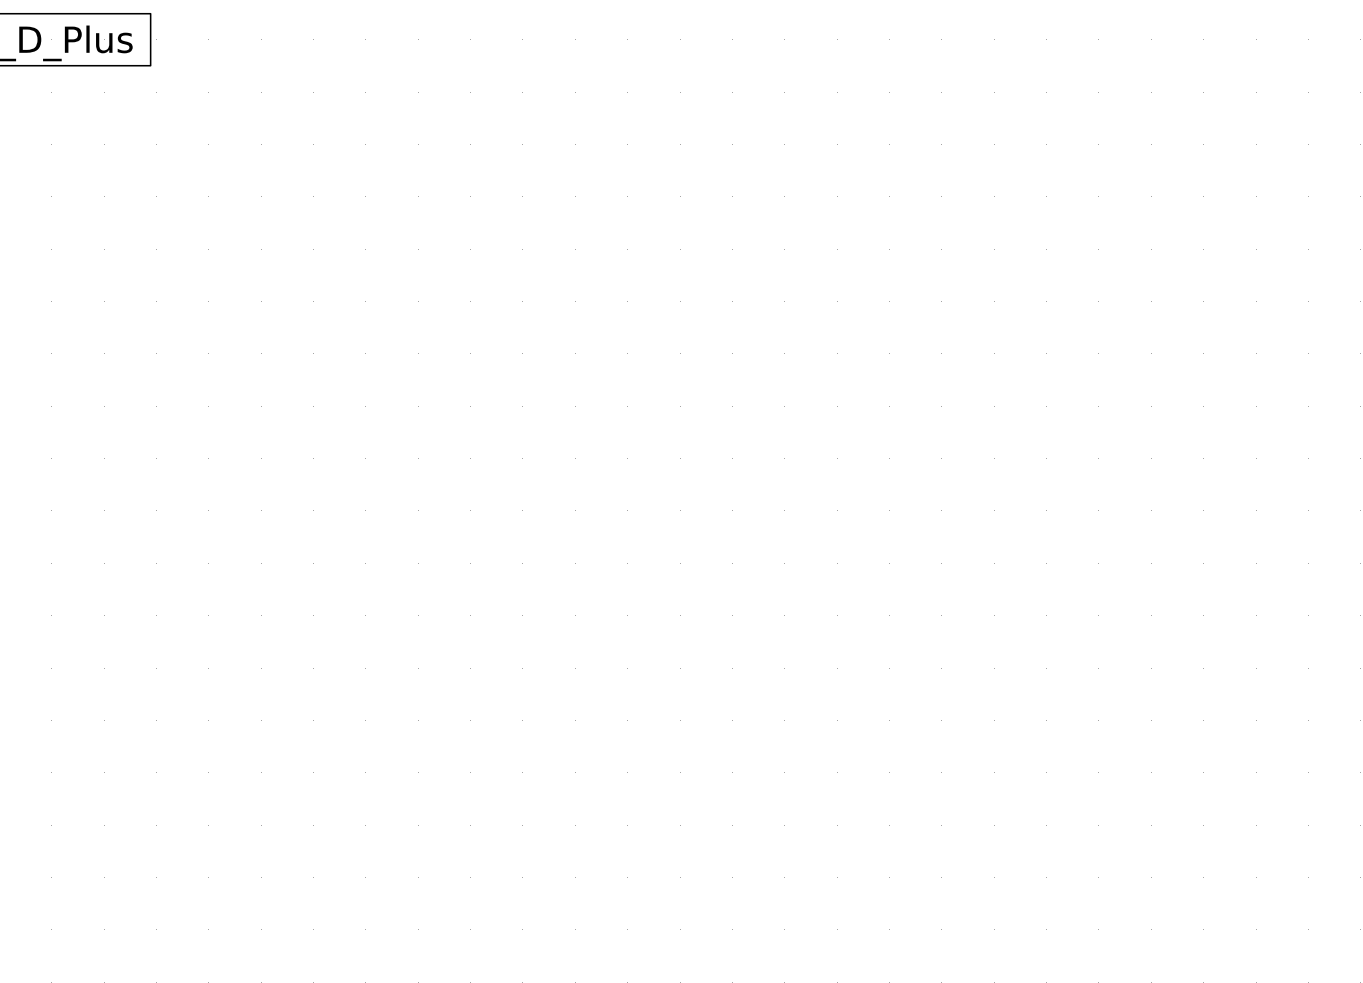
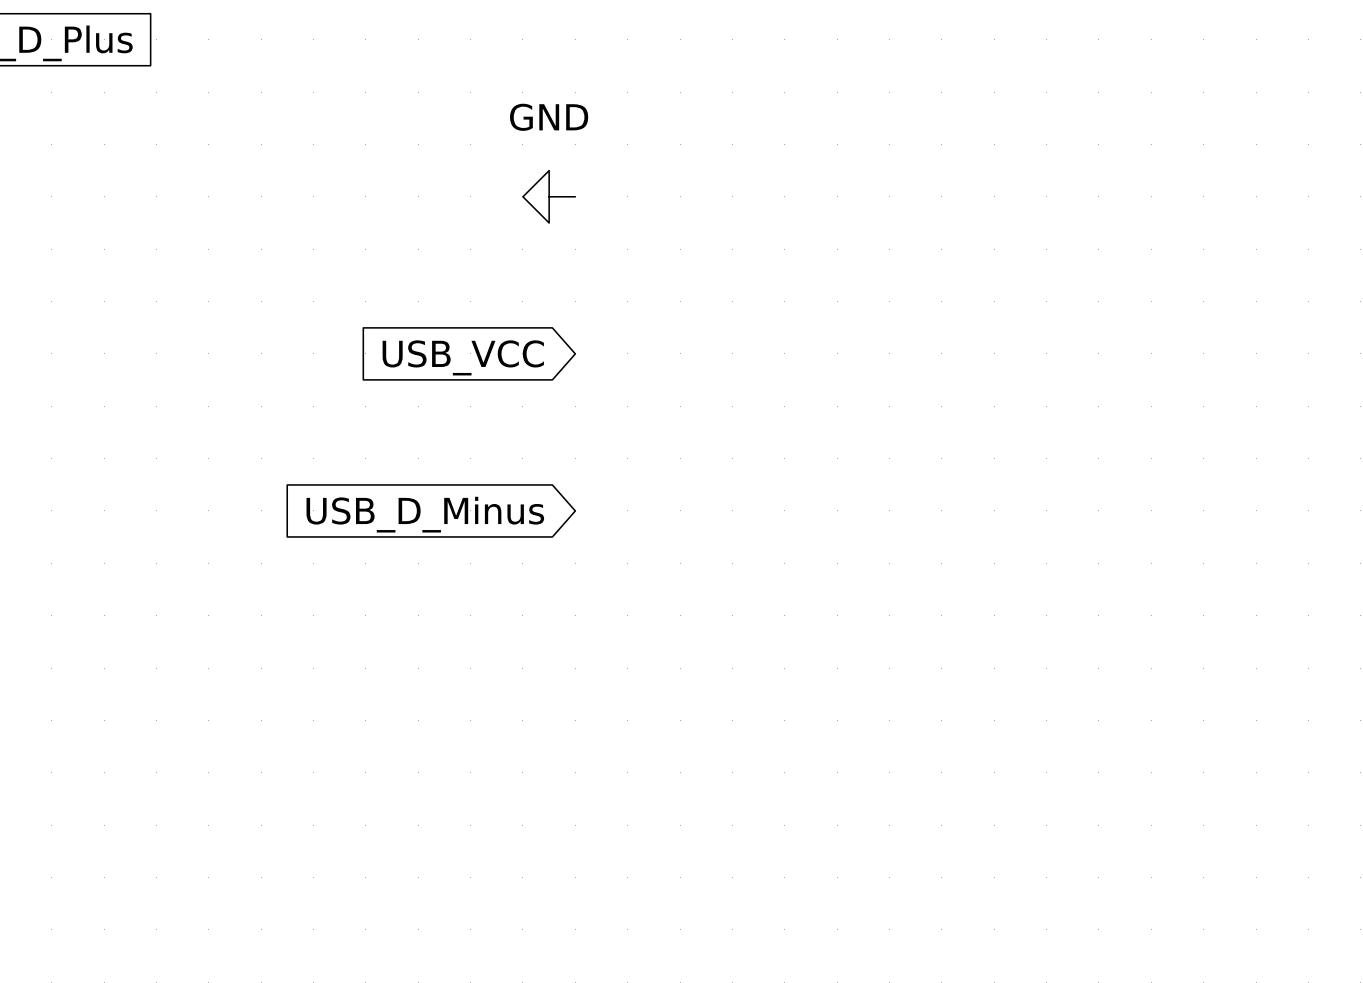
power symbol: none -> GND (549, 196)
global label: none -> USB_VCC (463, 357)
global label: none -> USB_D_Minus (425, 514)

